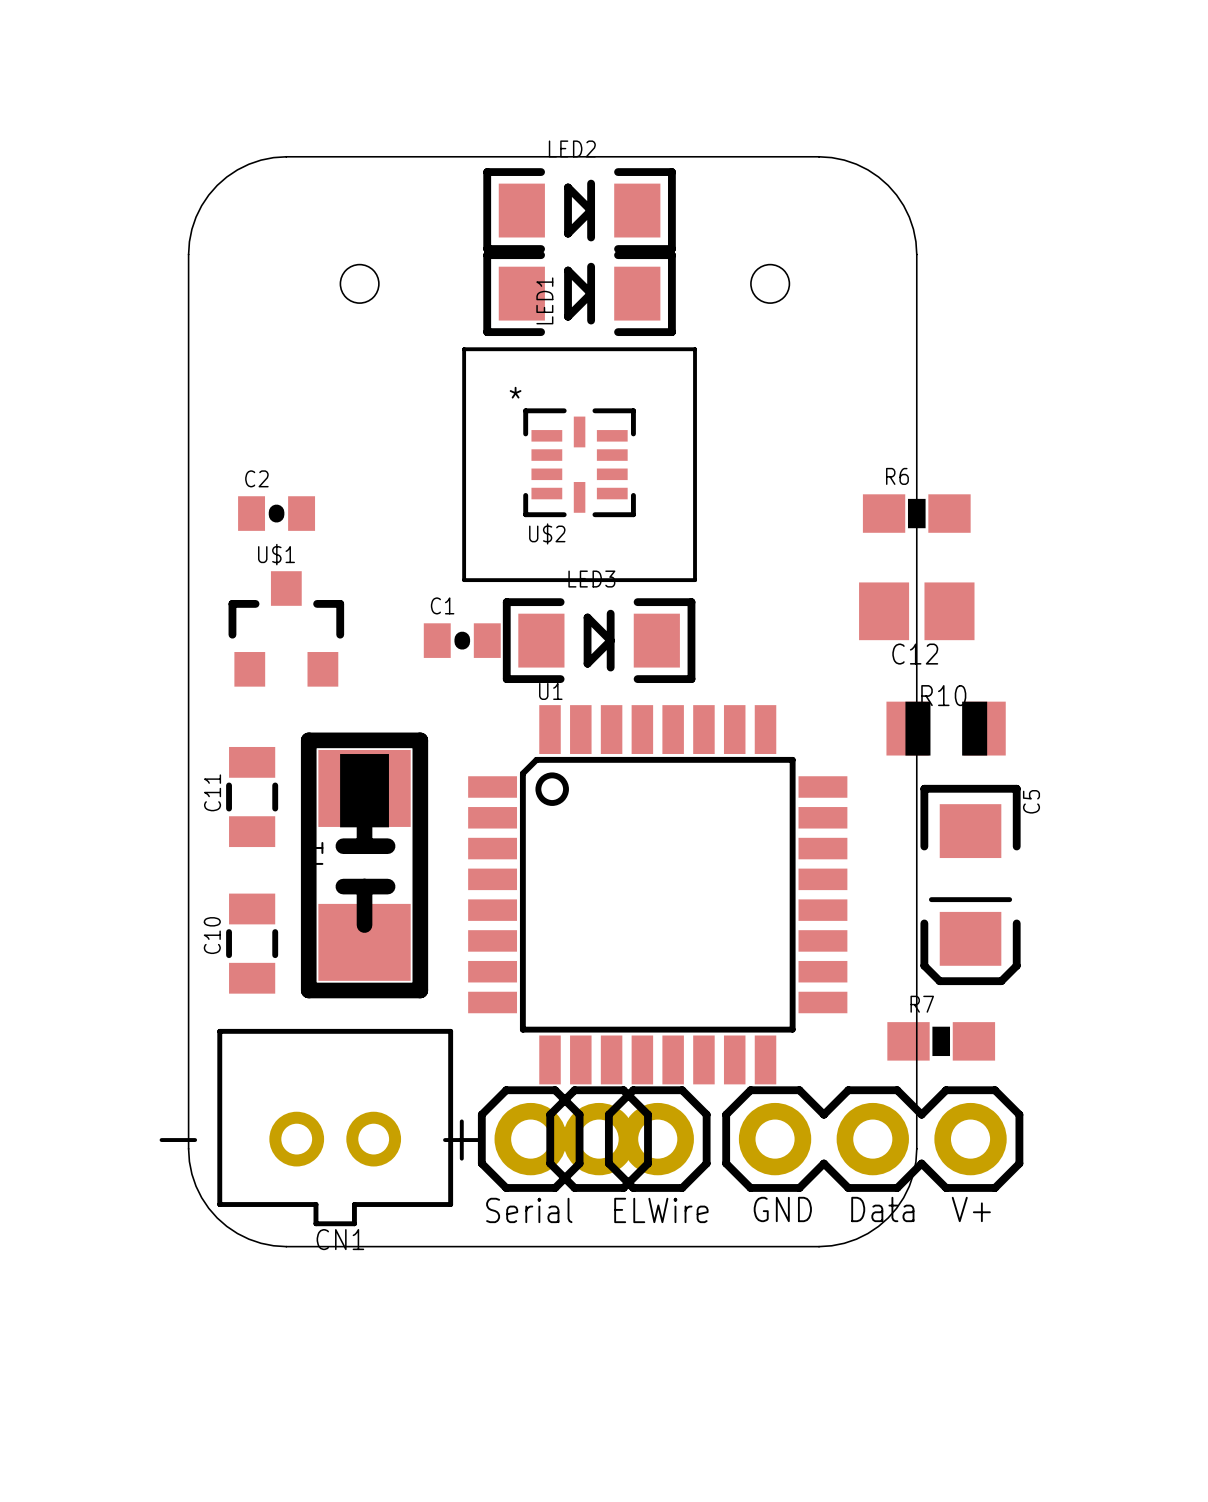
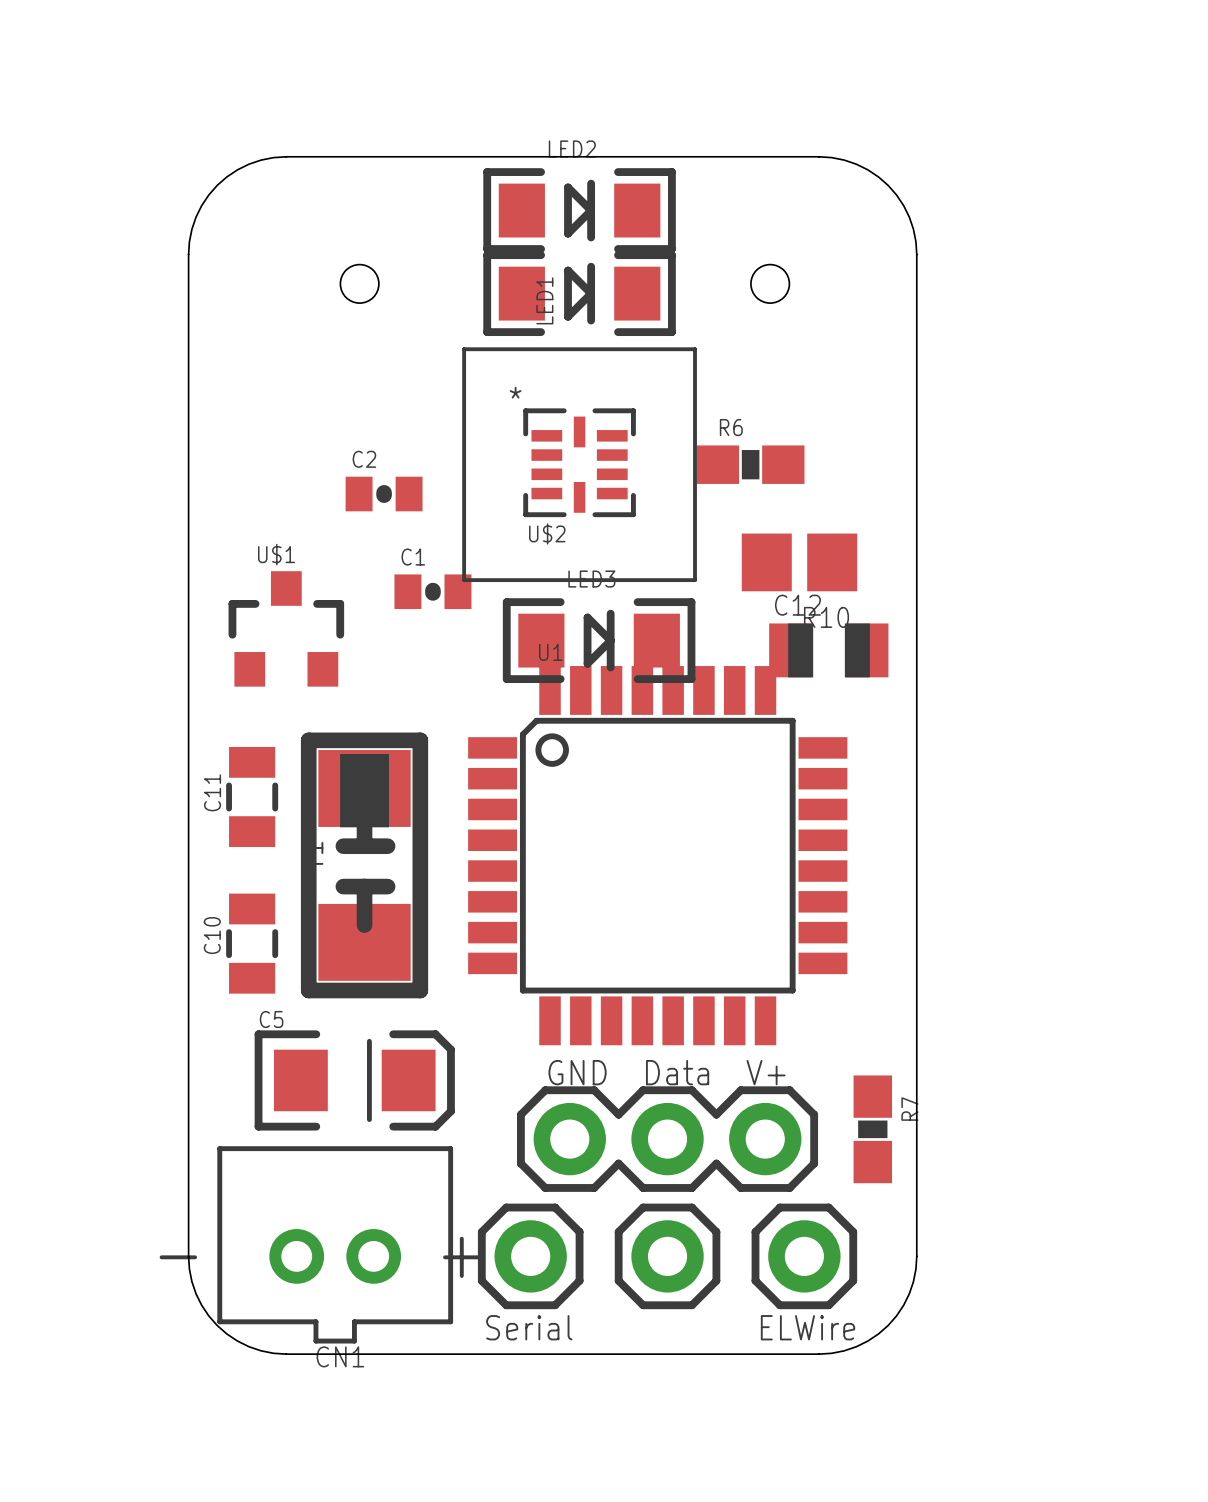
C2 position: (276, 513) -> (384, 494)
R6 position: (916, 513) -> (750, 464)
C12 position: (916, 611) -> (799, 562)
C1 position: (462, 640) -> (432, 591)
R10 position: (946, 728) -> (828, 650)
C5 rotation: 0° (970, 884) -> 90° counterclockwise (354, 1080)
C5 position: (970, 884) -> (354, 1080)
U1 position: (657, 894) -> (657, 855)
R7 rotation: 0° (941, 1041) -> 90° clockwise (872, 1129)
R7 position: (941, 1041) -> (872, 1129)
part footprint: [604, 1086, 711, 1192] -> [517, 1086, 819, 1192]
CN1 position: (335, 1127) -> (335, 1244)
part position: (530, 1139) -> (530, 1256)
part position: (599, 1139) -> (667, 1256)
part: (872, 1139) -> none
board edge: (188, 1148) (191, 1174) (196, 1186) (208, 1208) (217, 1217) (226, 1226) (248, 1239) (261, 1243) (286, 1246) (831, 1245) (856, 1239) (878, 1226) (888, 1217) (896, 1208) (909, 1186) (913, 1174) (916, 1148) -> (188, 1148) (188, 1256) (191, 1281) (196, 1293) (208, 1315) (226, 1333) (248, 1346) (261, 1350) (286, 1354) (819, 1354) (844, 1350) (867, 1341) (888, 1325) (896, 1315) (909, 1293) (913, 1281) (916, 1256) (916, 1148)
text position: GND Data V+ (872, 1209) -> GND Data V+ (667, 1072)
part value: ELWire (661, 1210) -> none
part: none -> ELWire (804, 1256)

